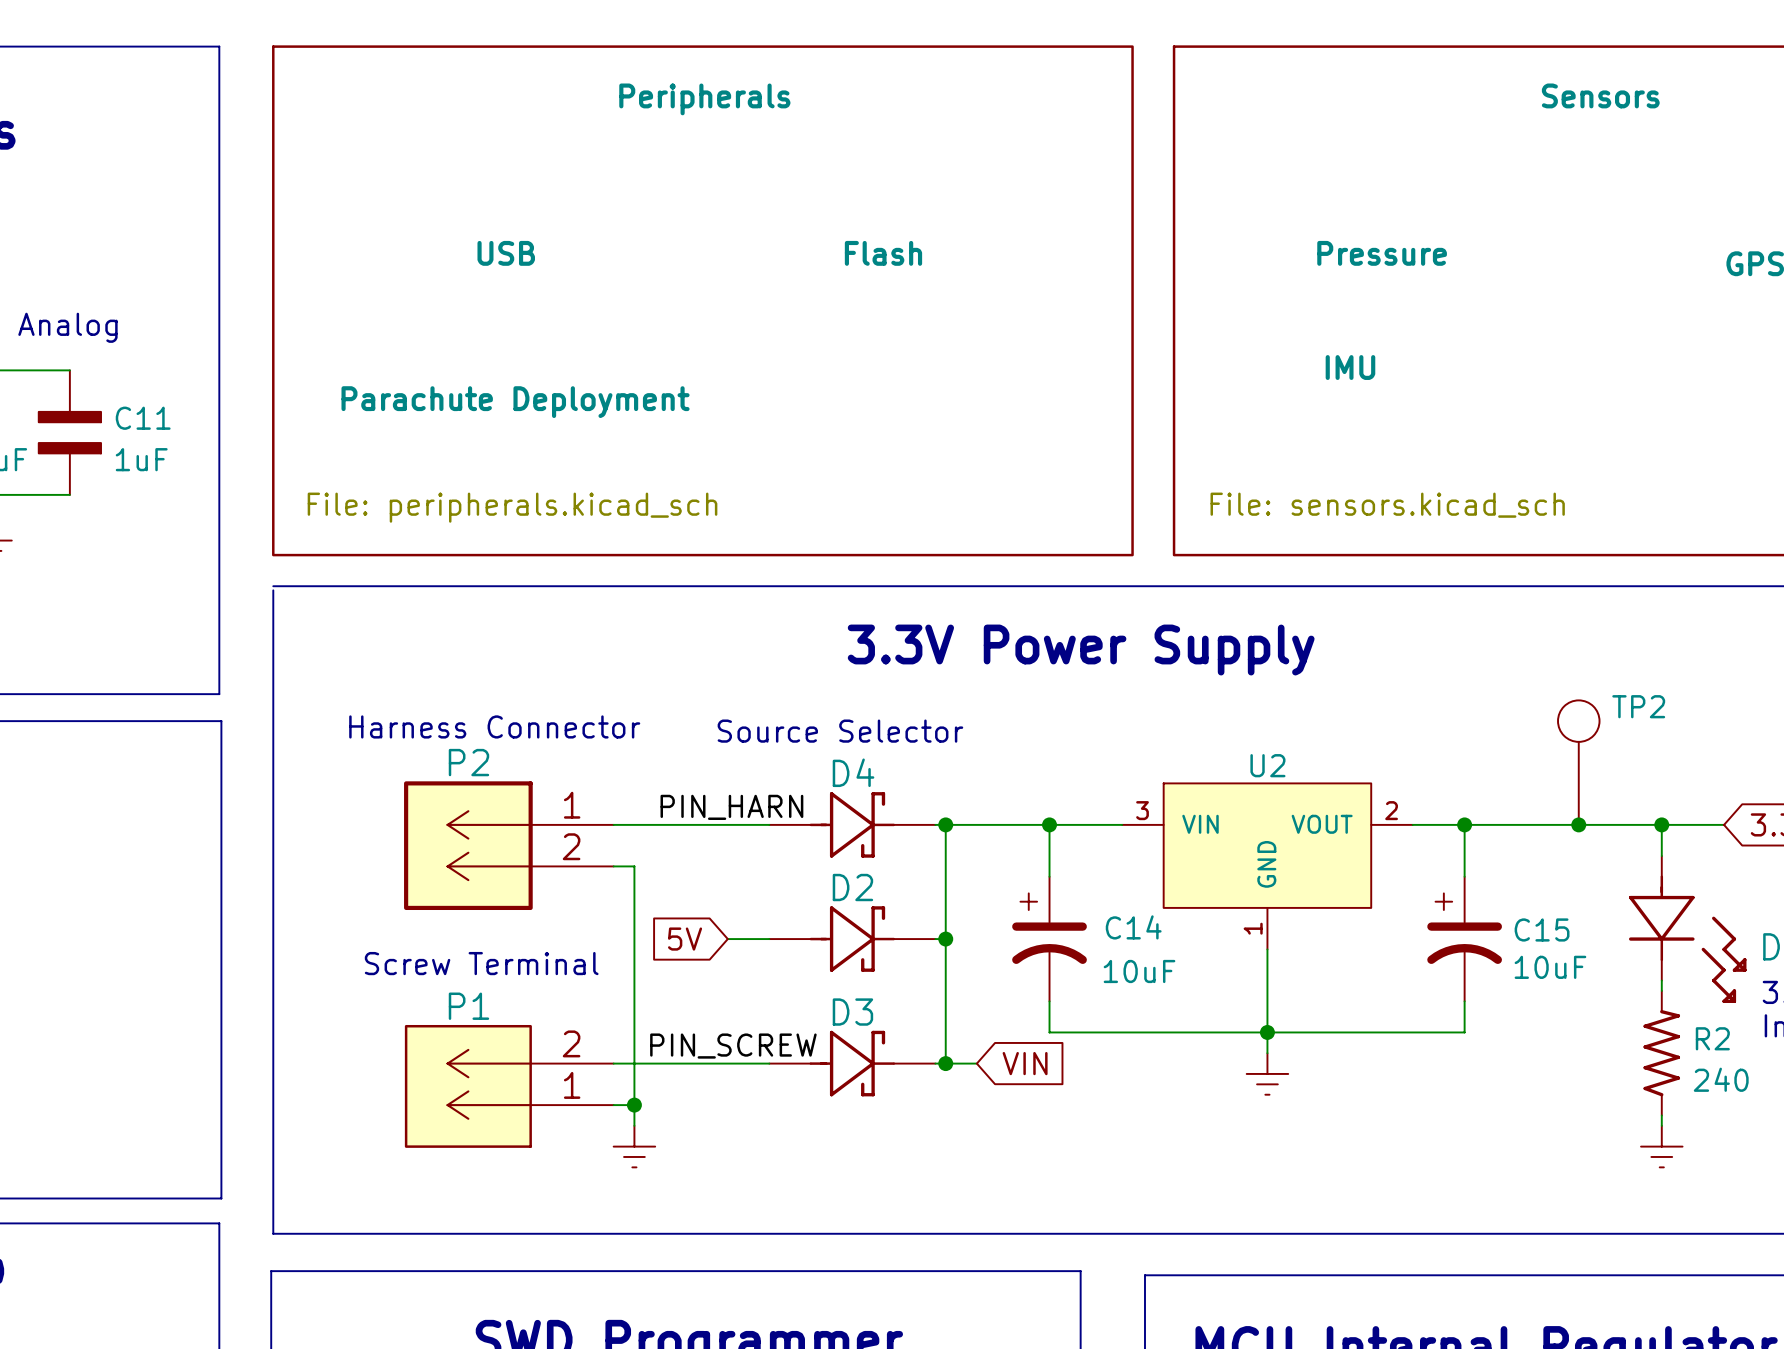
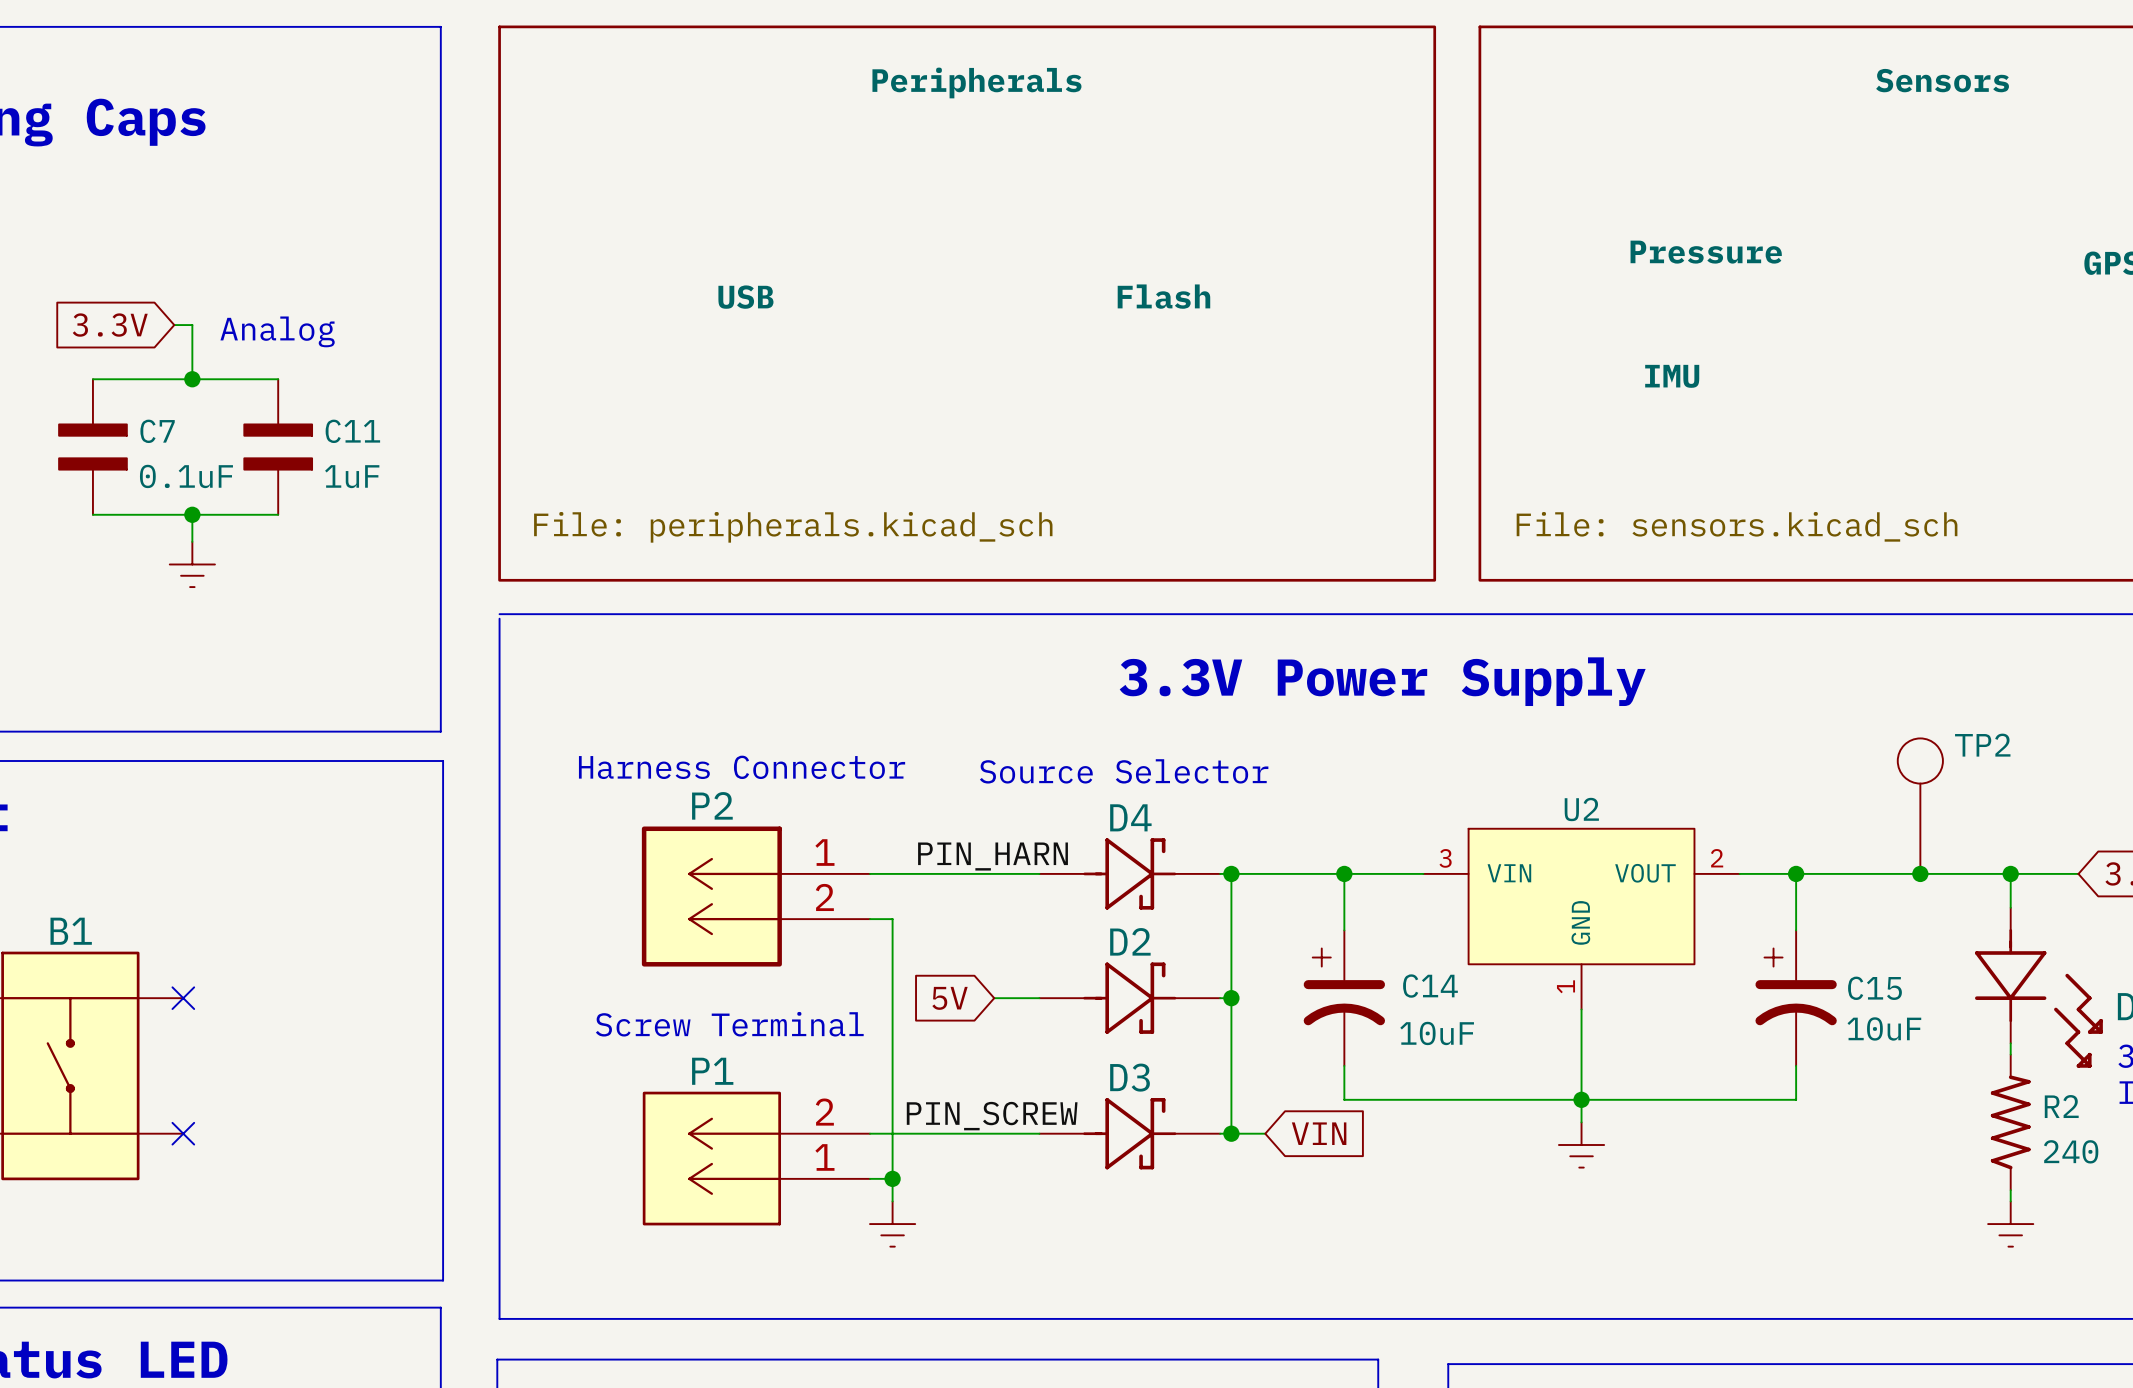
sheet Peripherals text position: USB (506, 253) -> USB (745, 297)
sheet Peripherals text position: Flash (883, 253) -> Flash (1163, 296)
sheet Peripherals text: Parachute Deployment (515, 402) -> none

